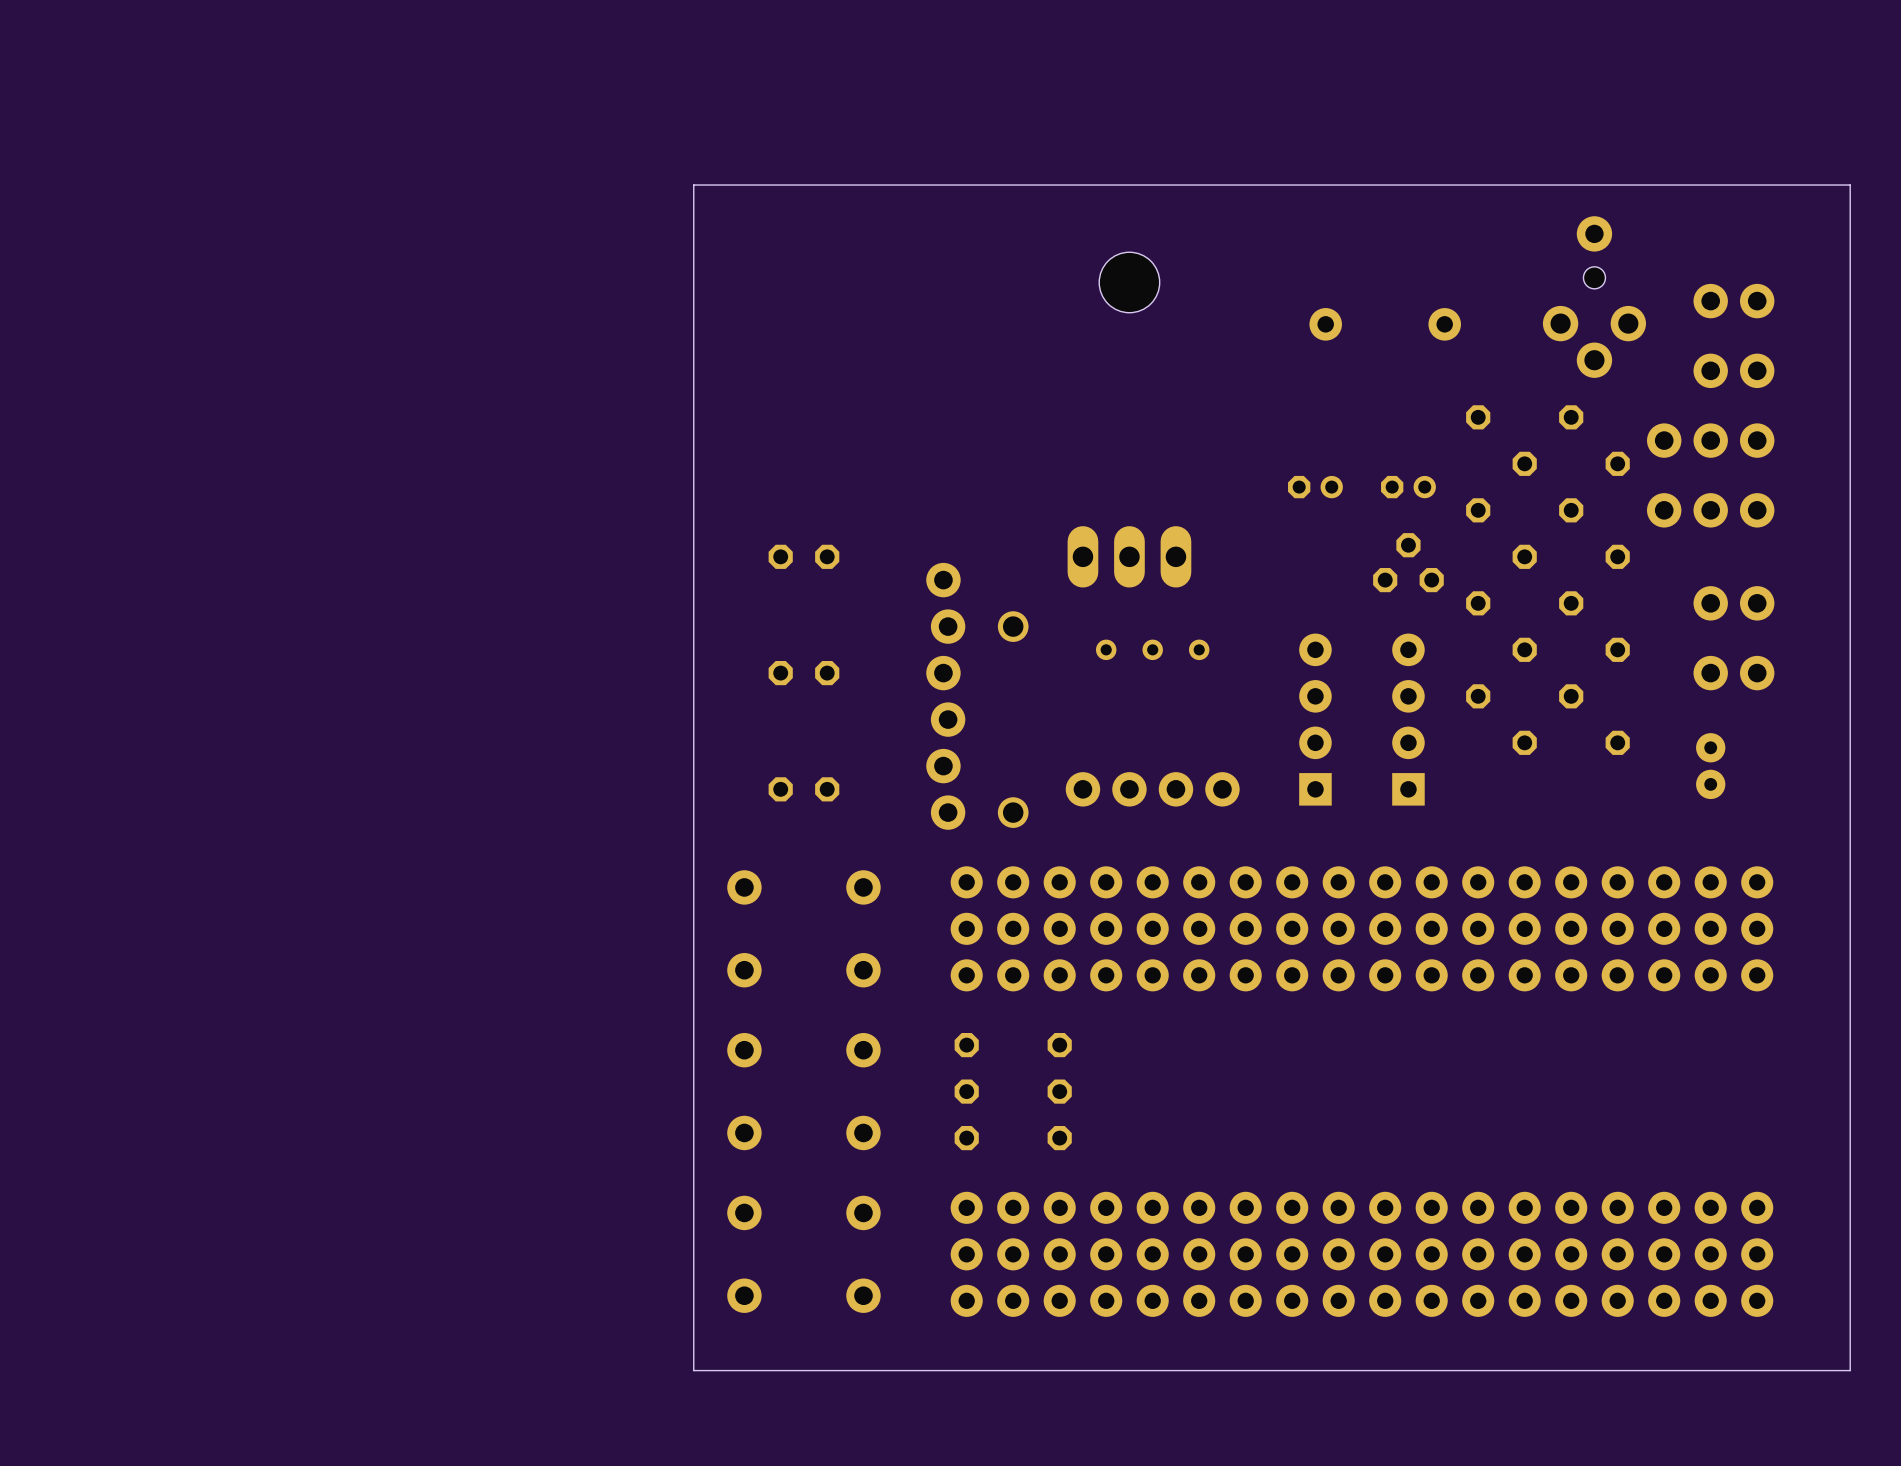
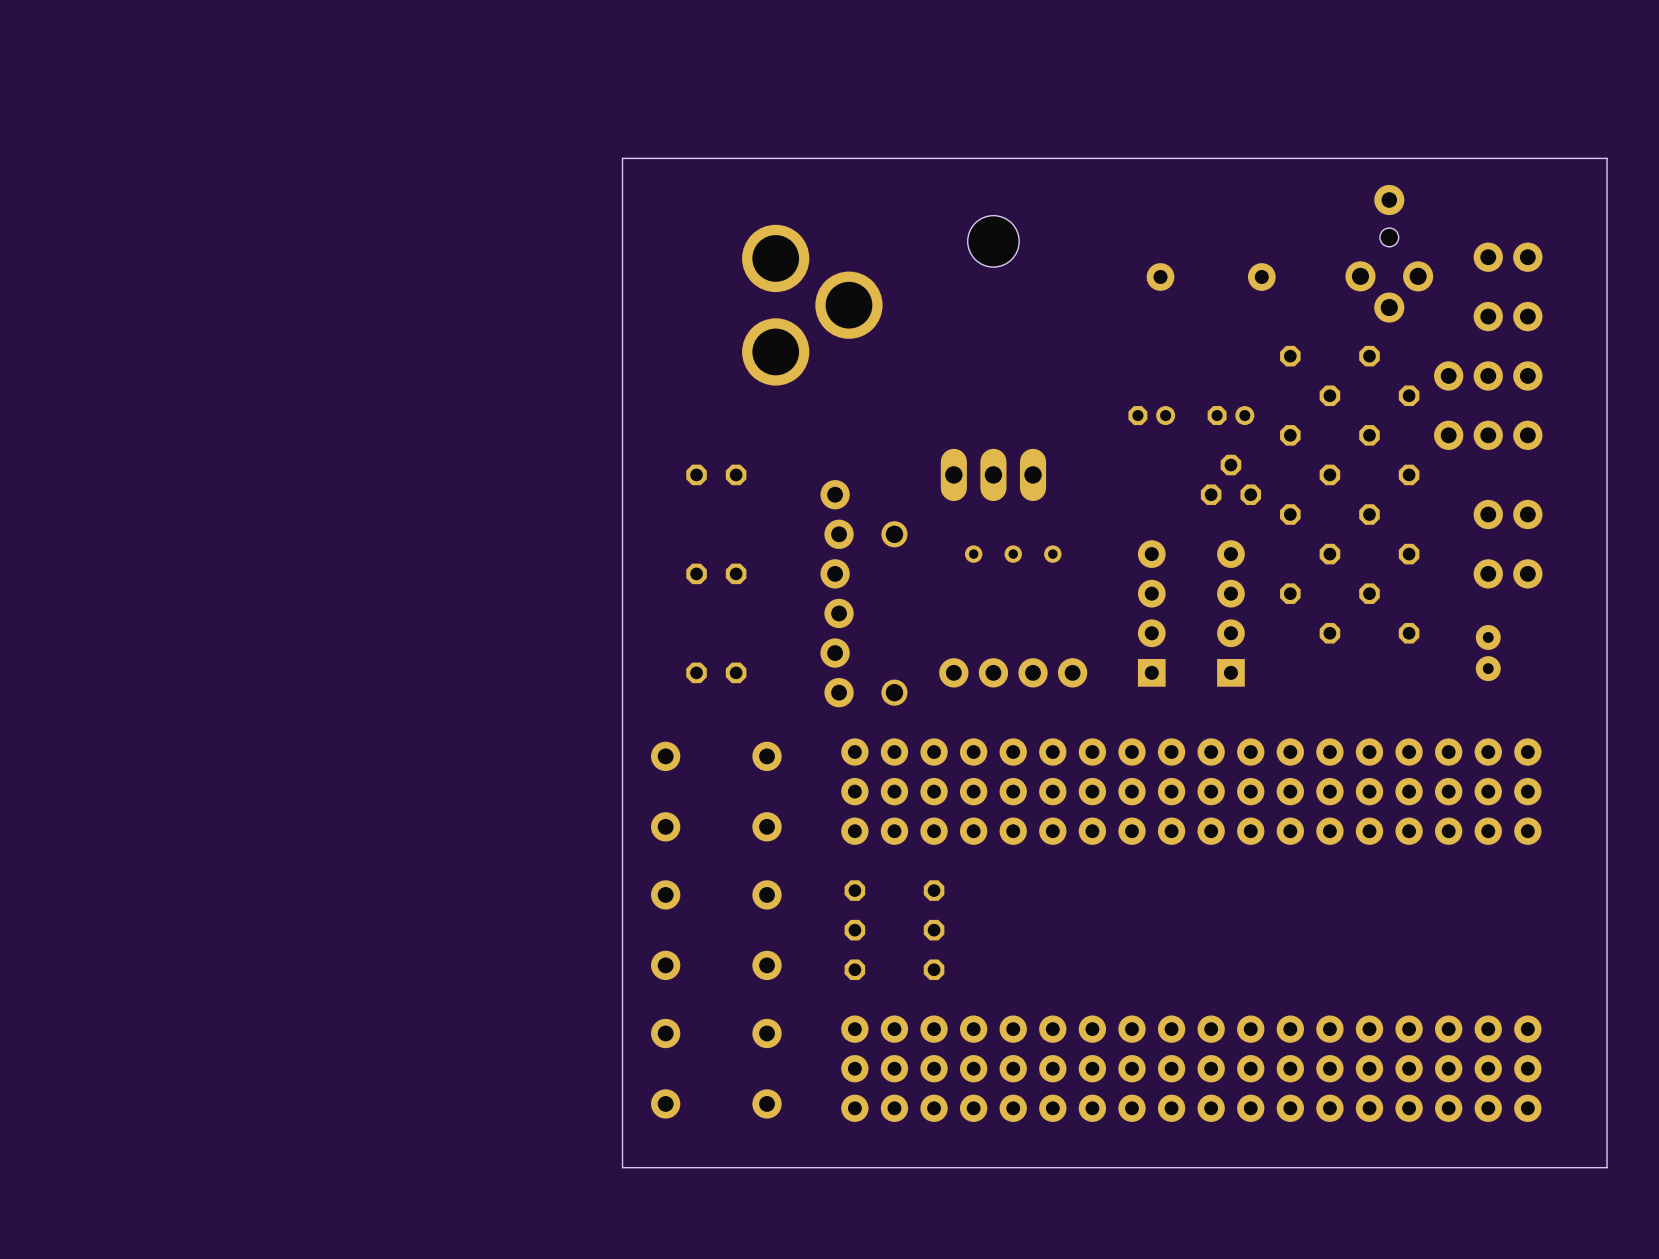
part: none -> (812, 305)

